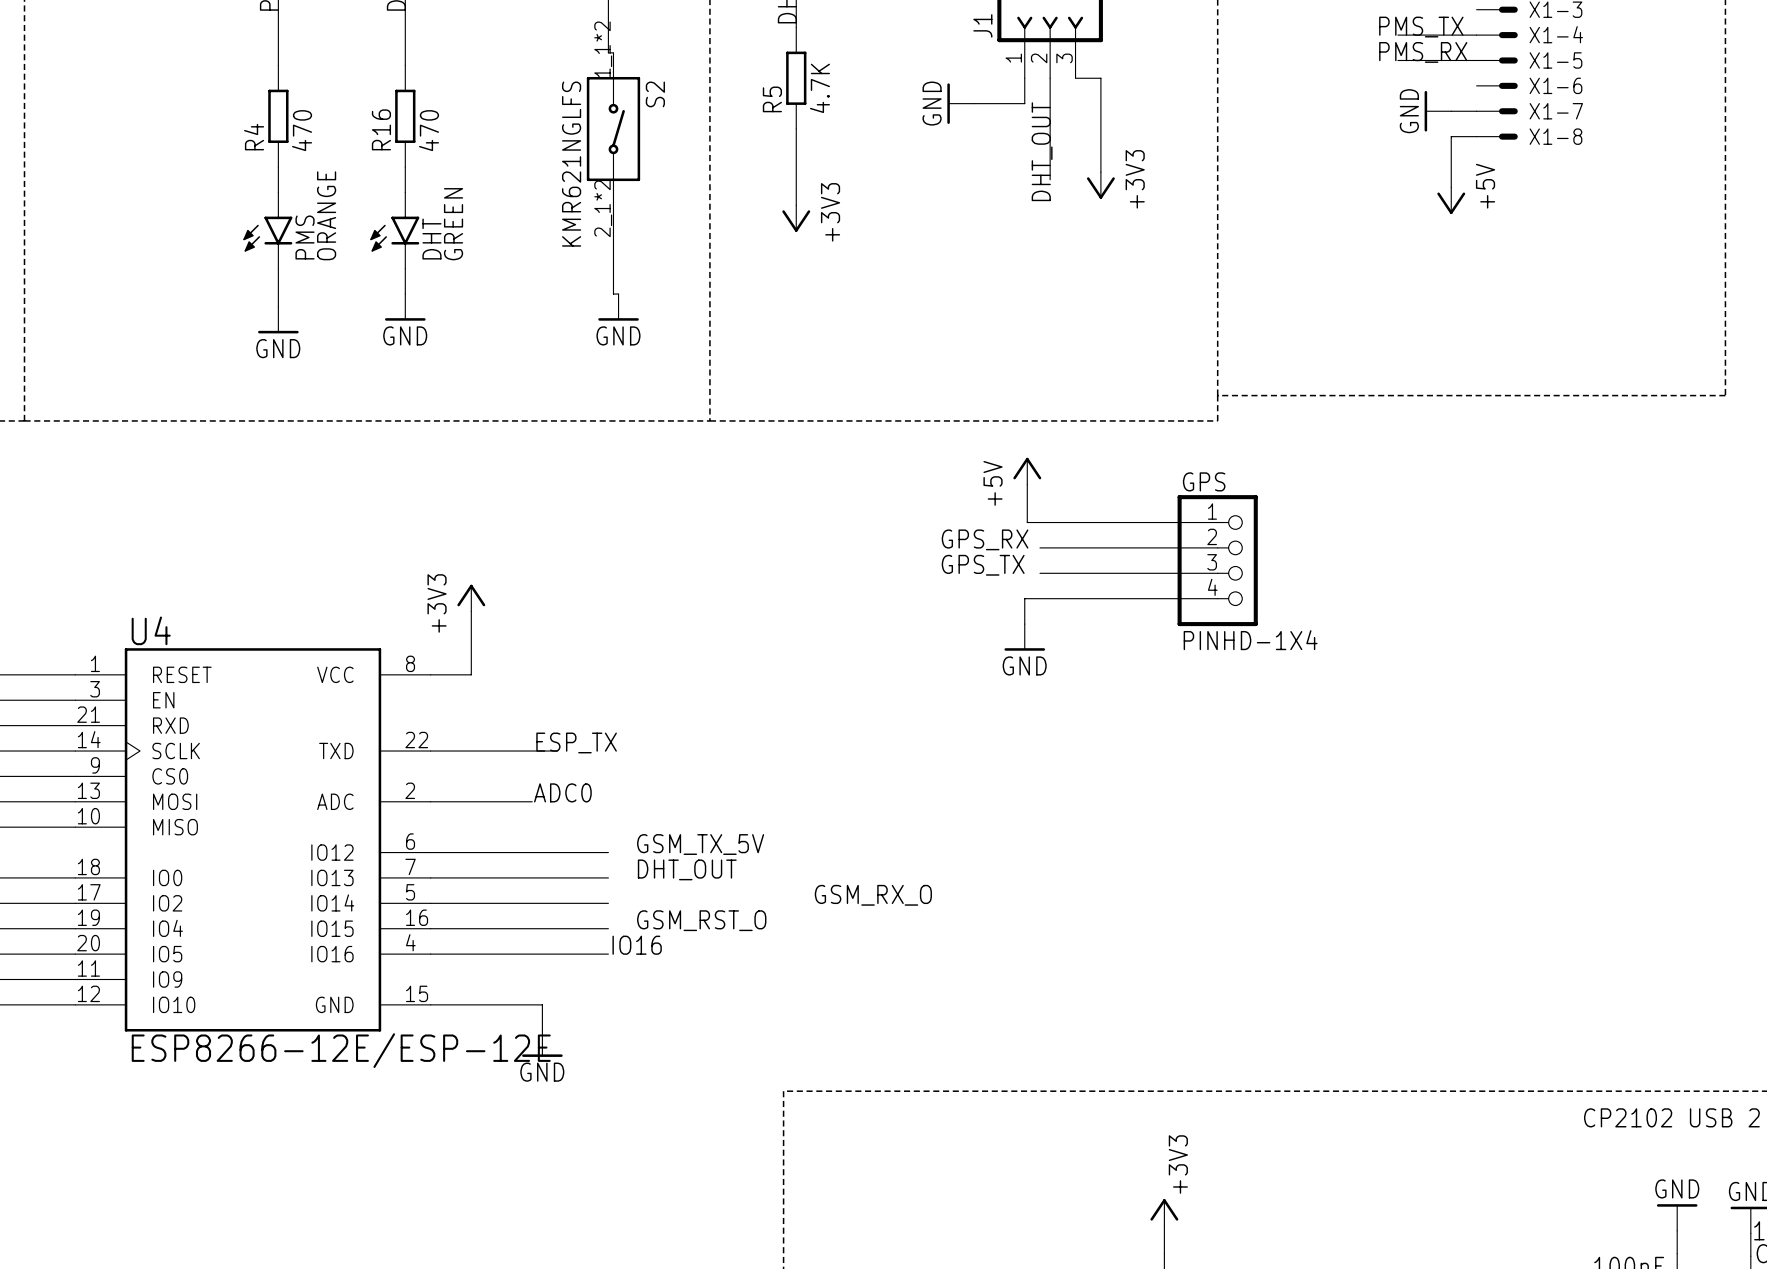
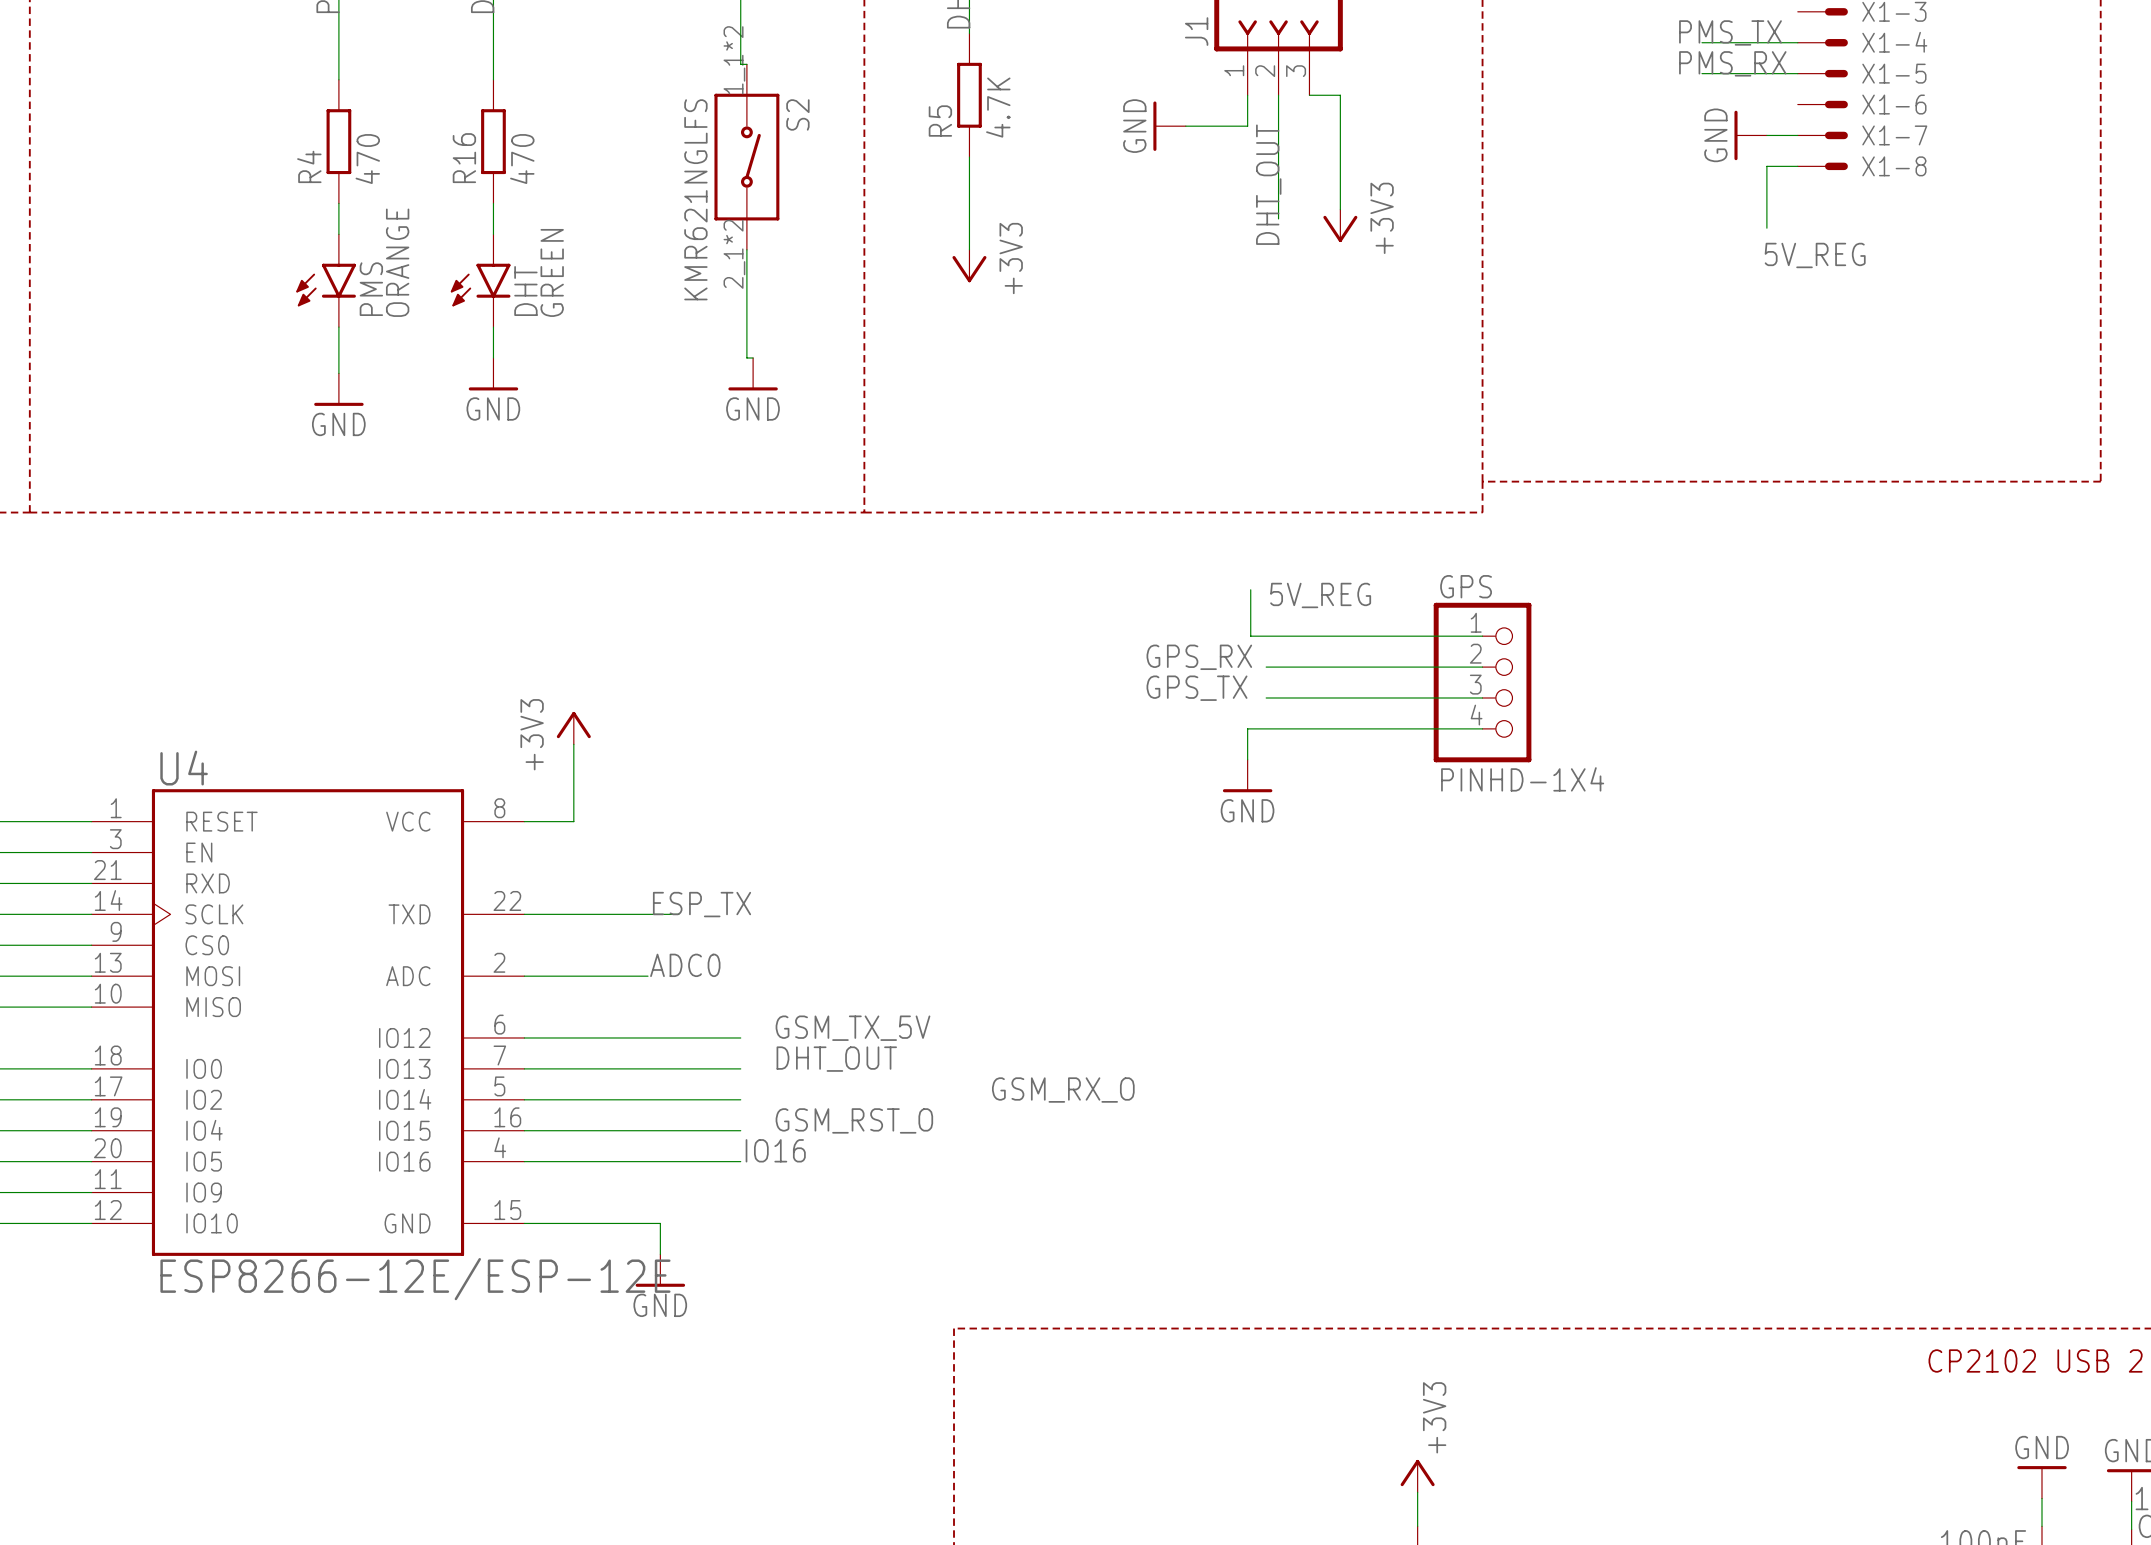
power symbol: +5V (1451, 200) -> none
label: none -> 5V_REG (1815, 255)
power symbol: +5V (1027, 471) -> none
label: none -> 5V_REG (1320, 595)

